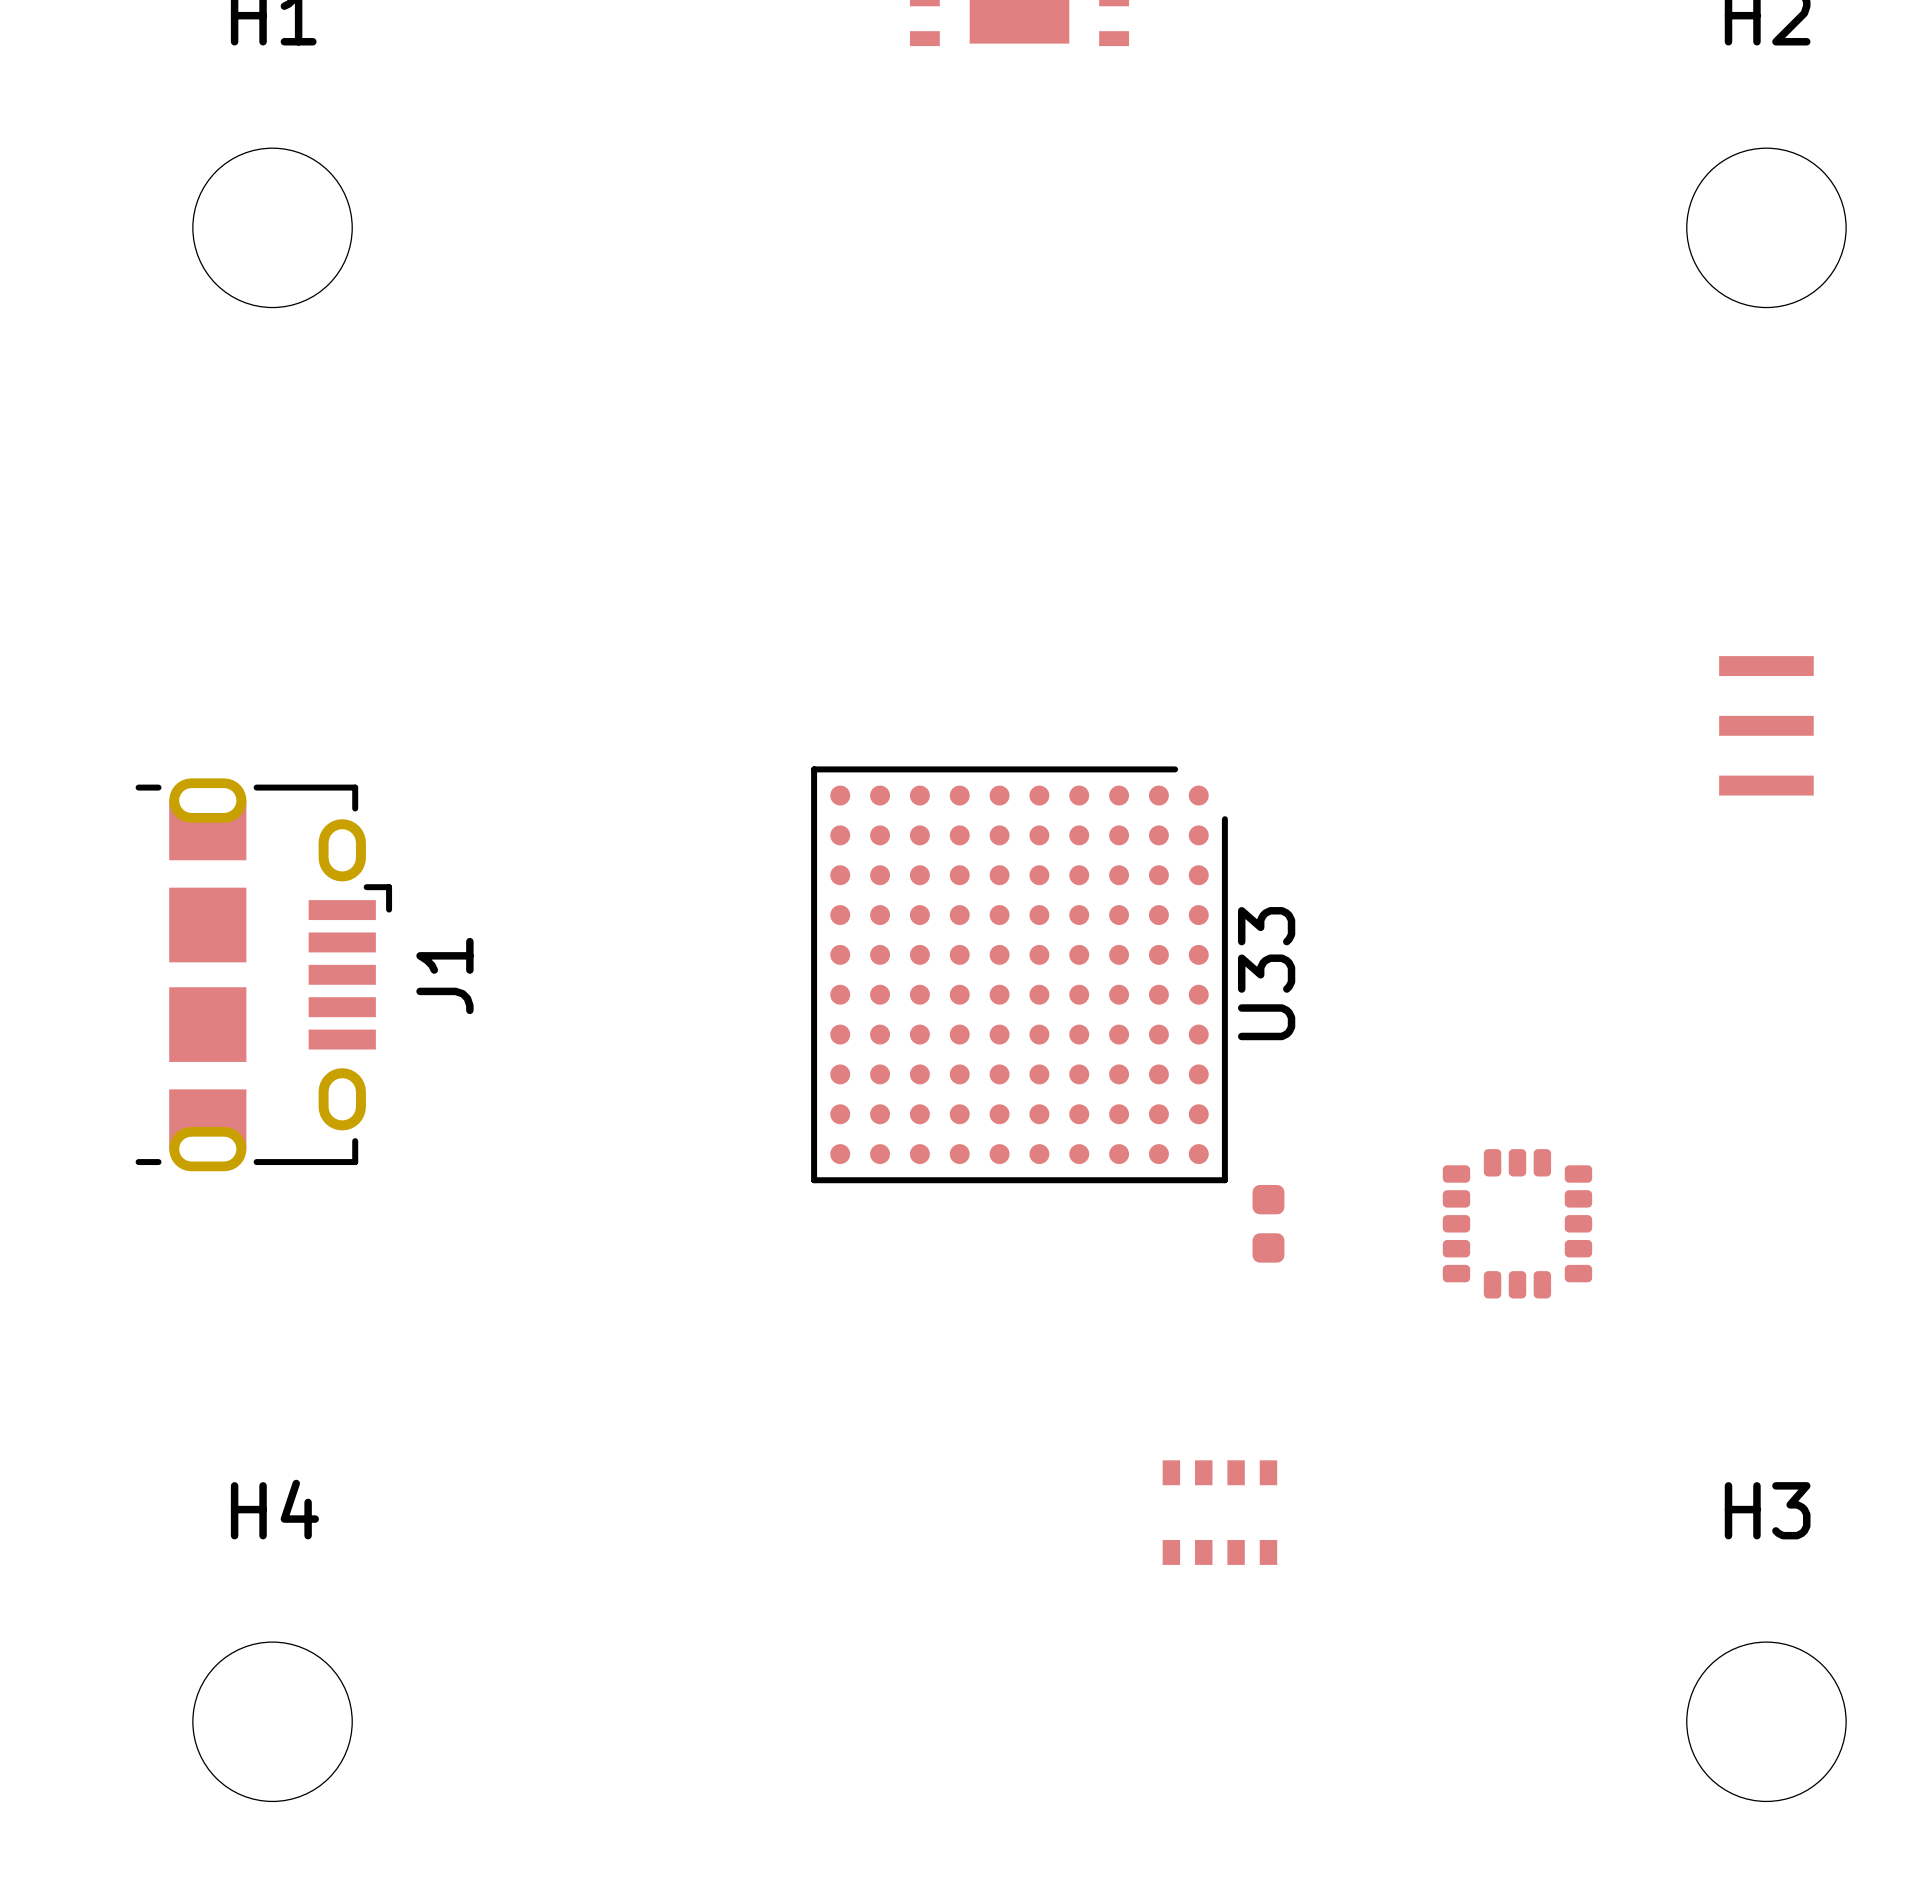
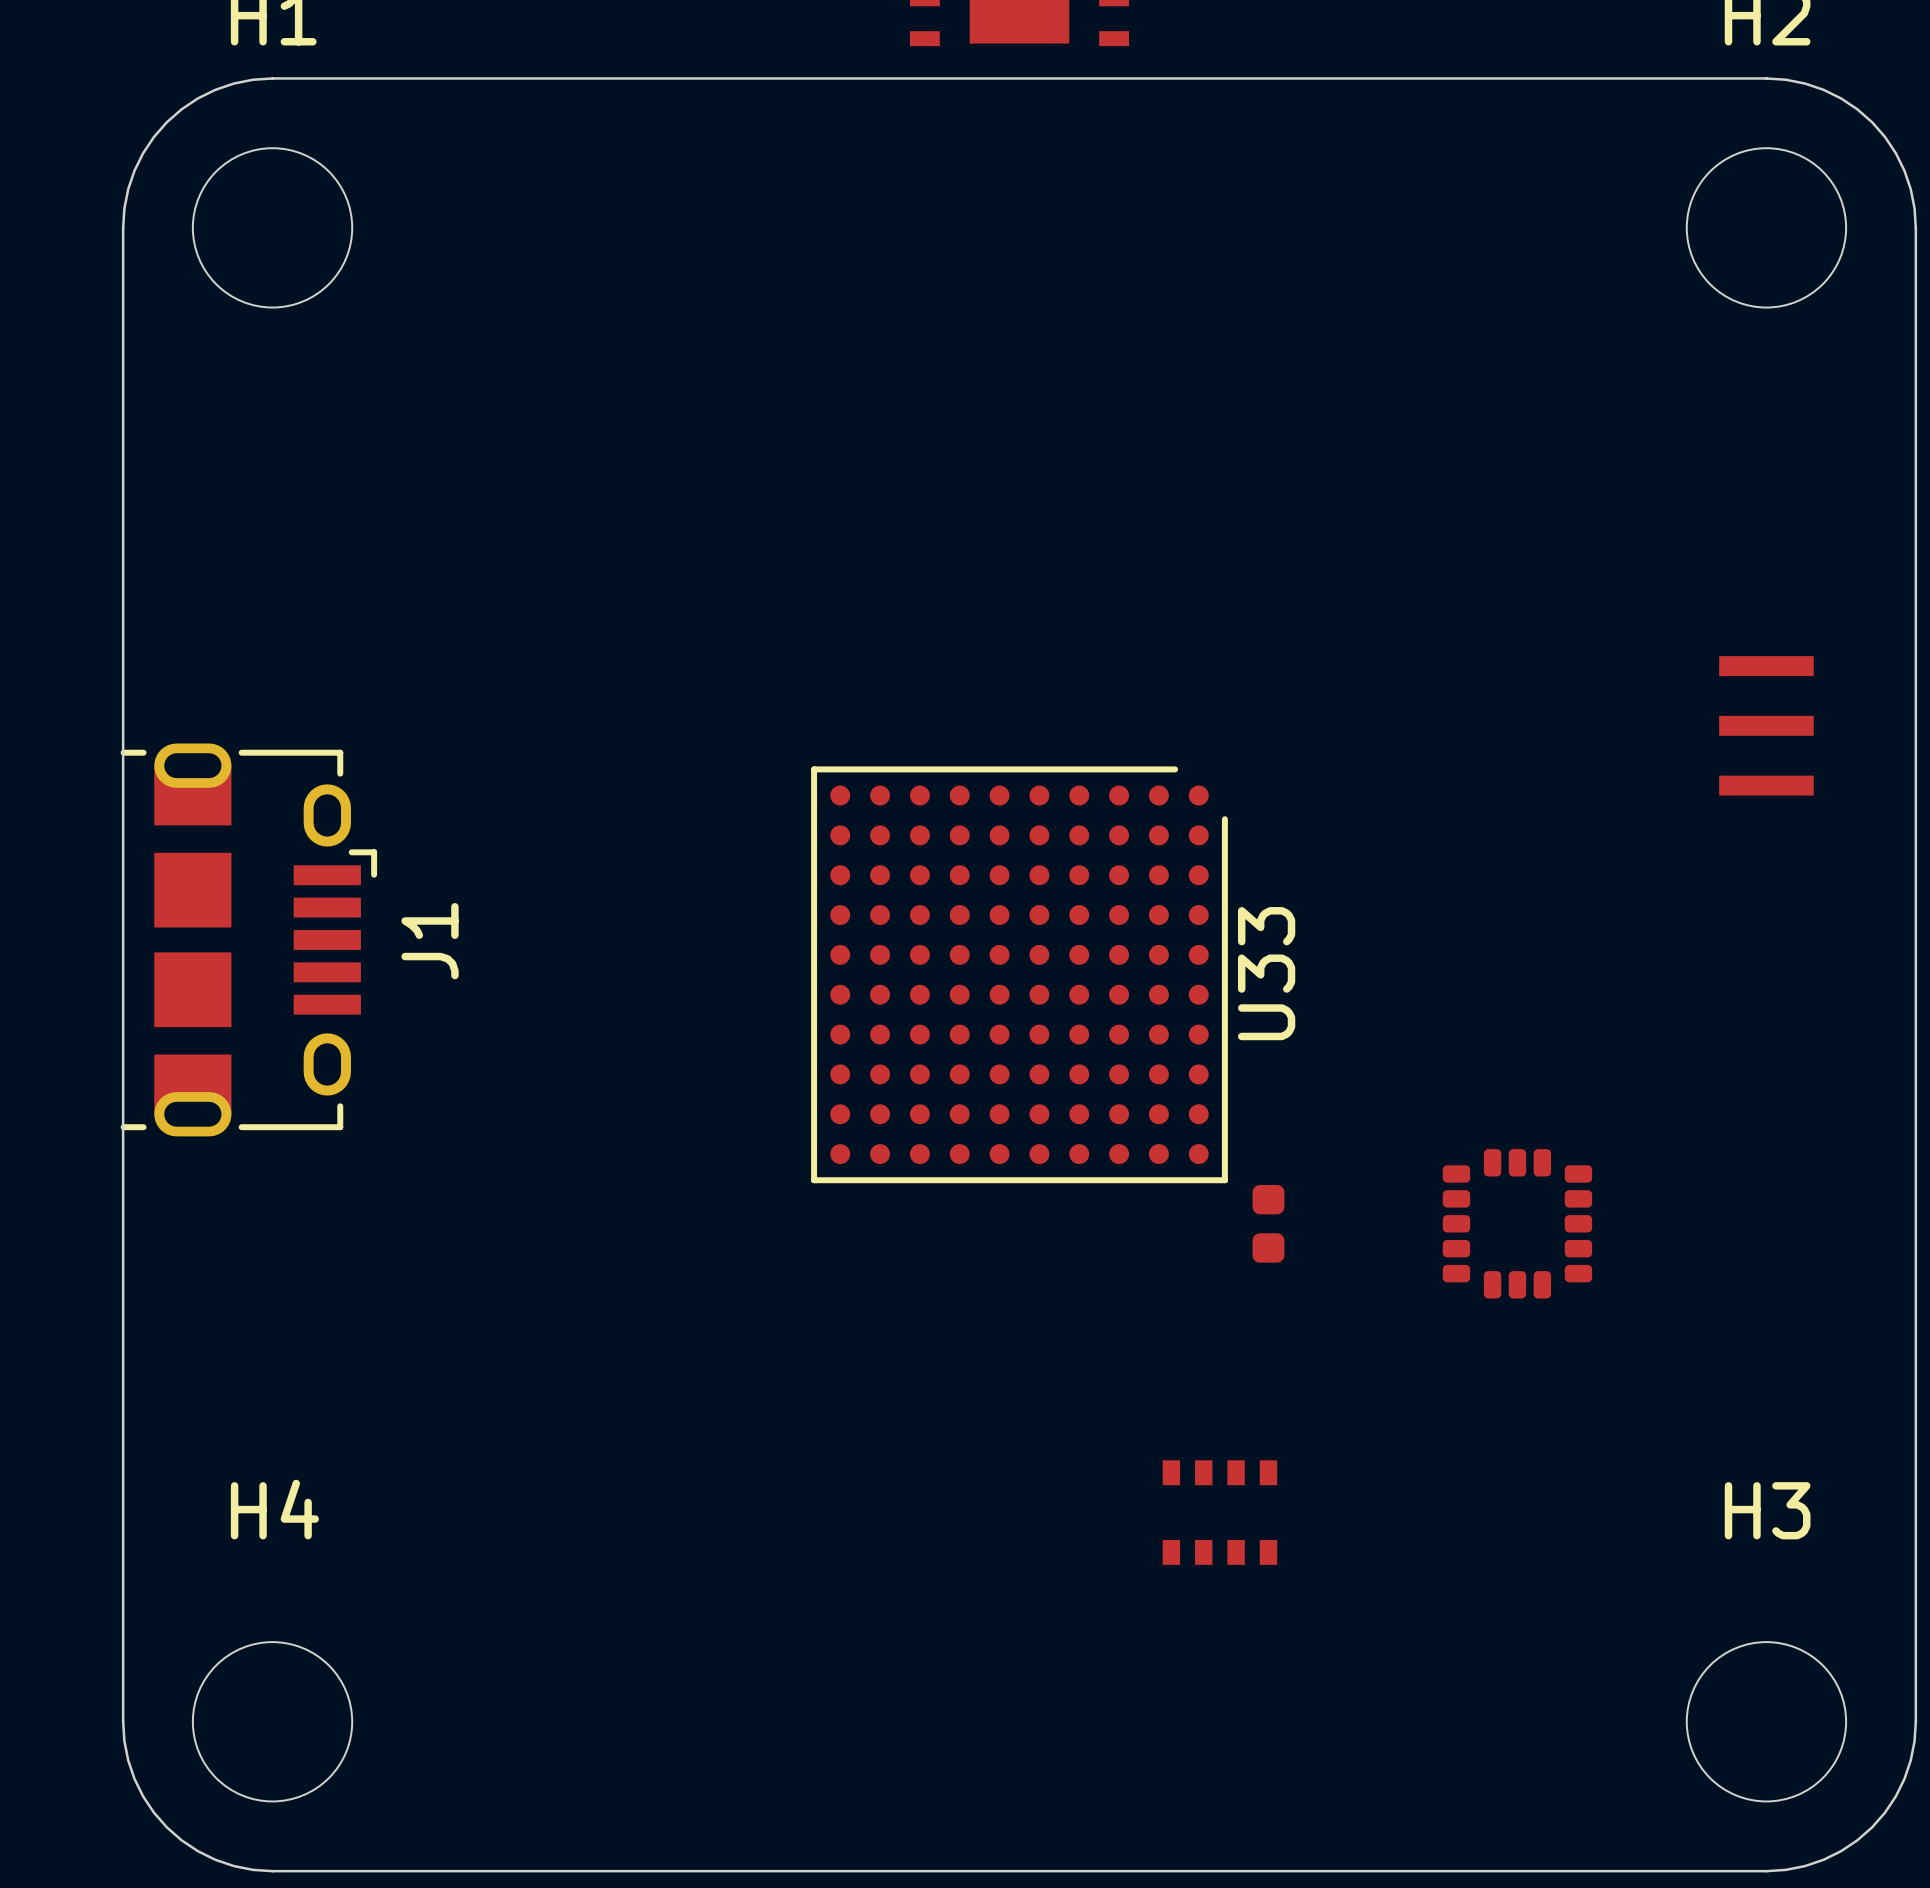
board edge: none -> (272, 78) (1766, 78) (1805, 83) (1823, 89) (1857, 109) (1872, 122) (1895, 153) (1904, 170) (1910, 189) (1915, 227) (1915, 1721) (1910, 1760) (1904, 1778) (1895, 1796) (1872, 1827) (1857, 1840) (1823, 1859) (1785, 1869) (1766, 1871) (272, 1871) (253, 1869) (215, 1859) (197, 1851) (166, 1827) (154, 1812) (134, 1778) (124, 1741) (123, 1721) (123, 227) (124, 208) (134, 170) (154, 136) (166, 122) (181, 109) (215, 89) (233, 83) (272, 78)
J1 position: (263, 974) -> (248, 939)

